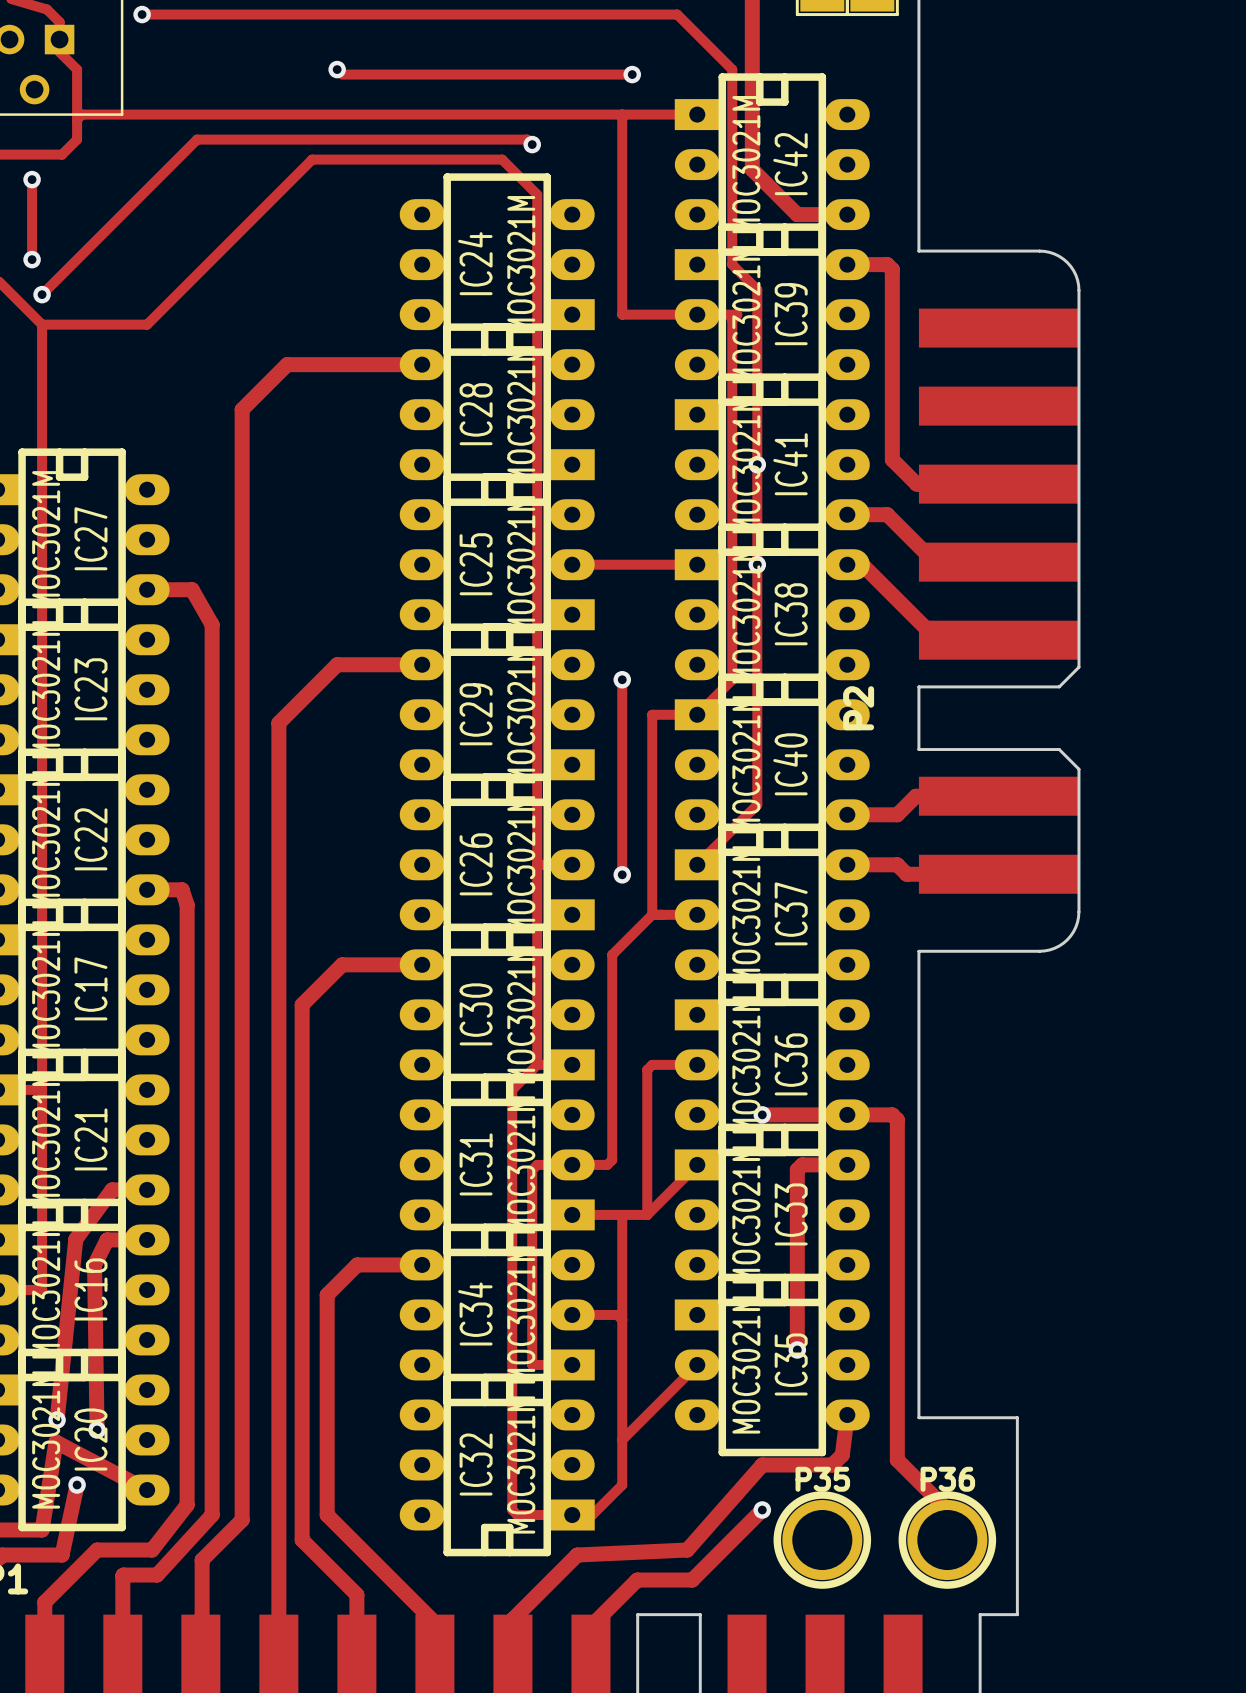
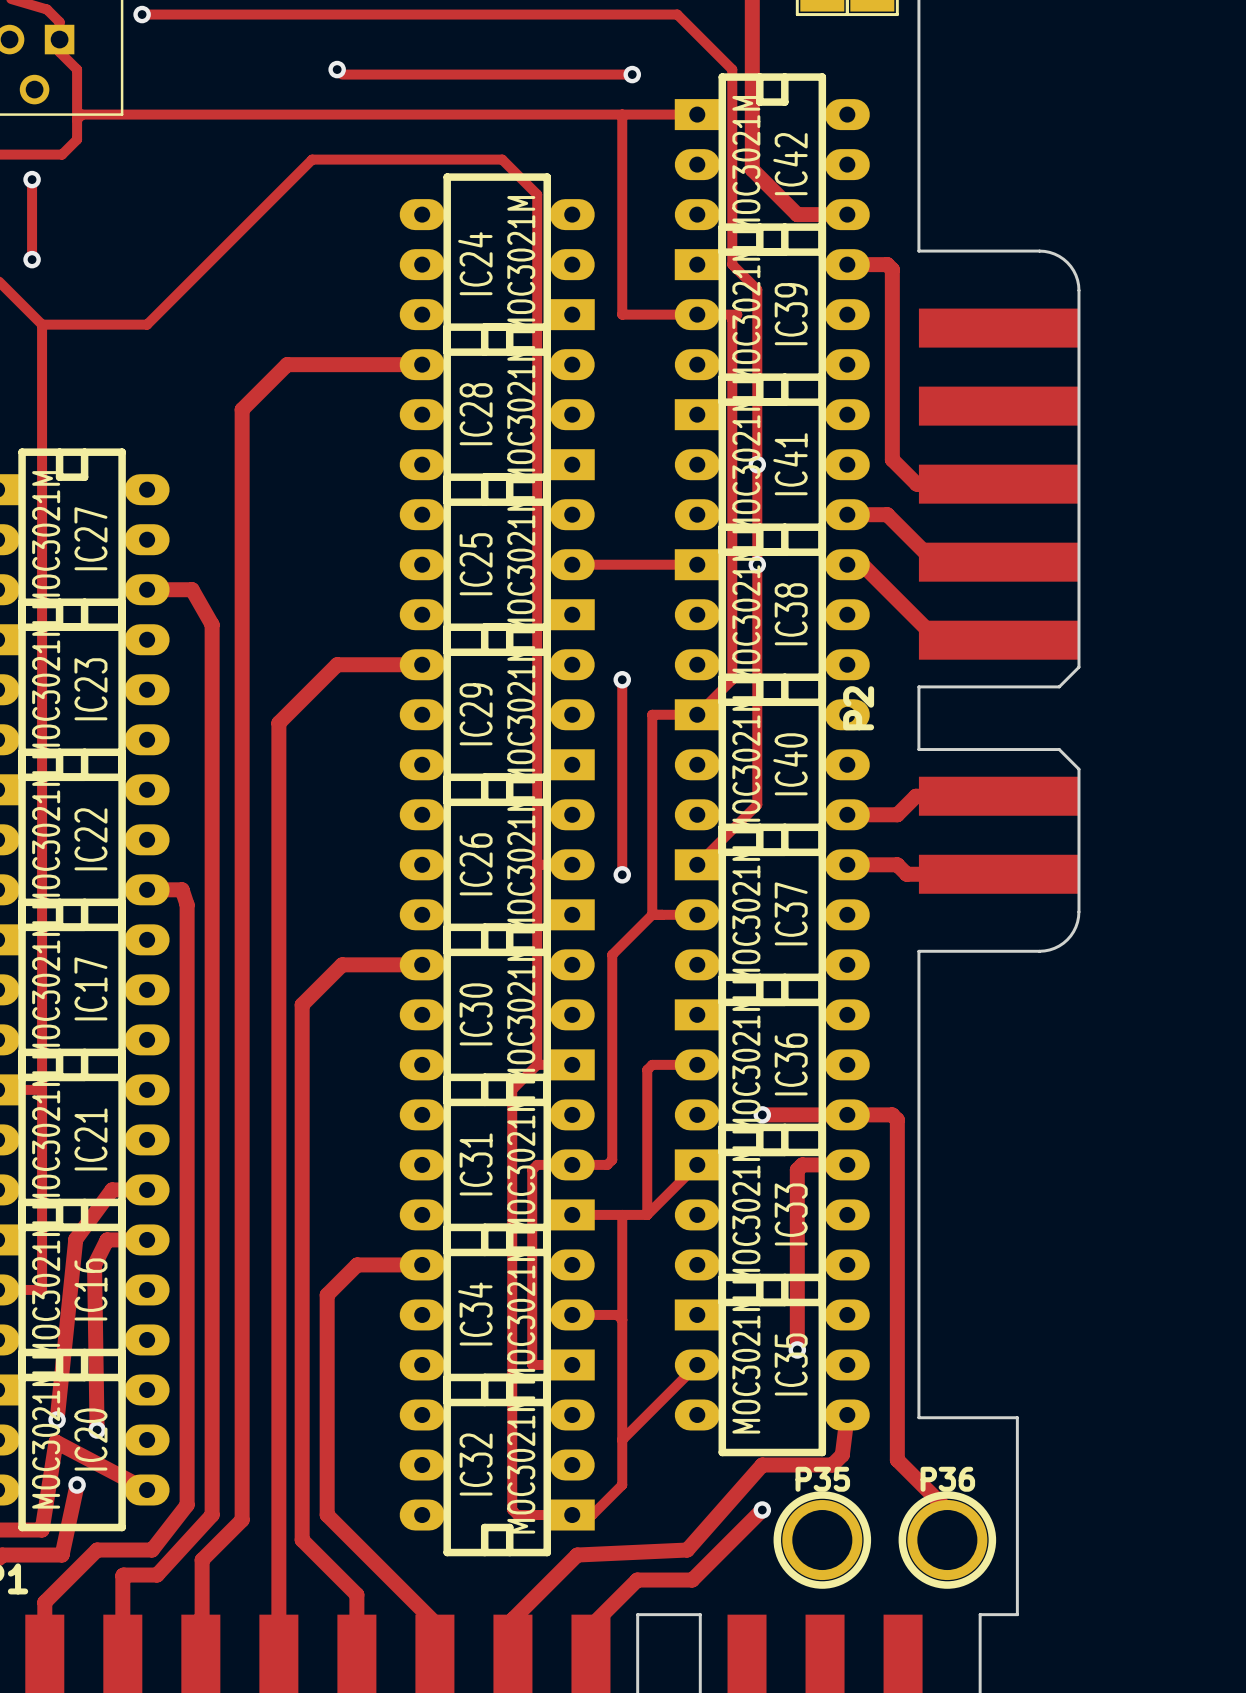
track: (532, 144) (527, 139) (197, 139) (42, 294) -> none
via: (532, 144) -> none
via: (42, 294) -> none

